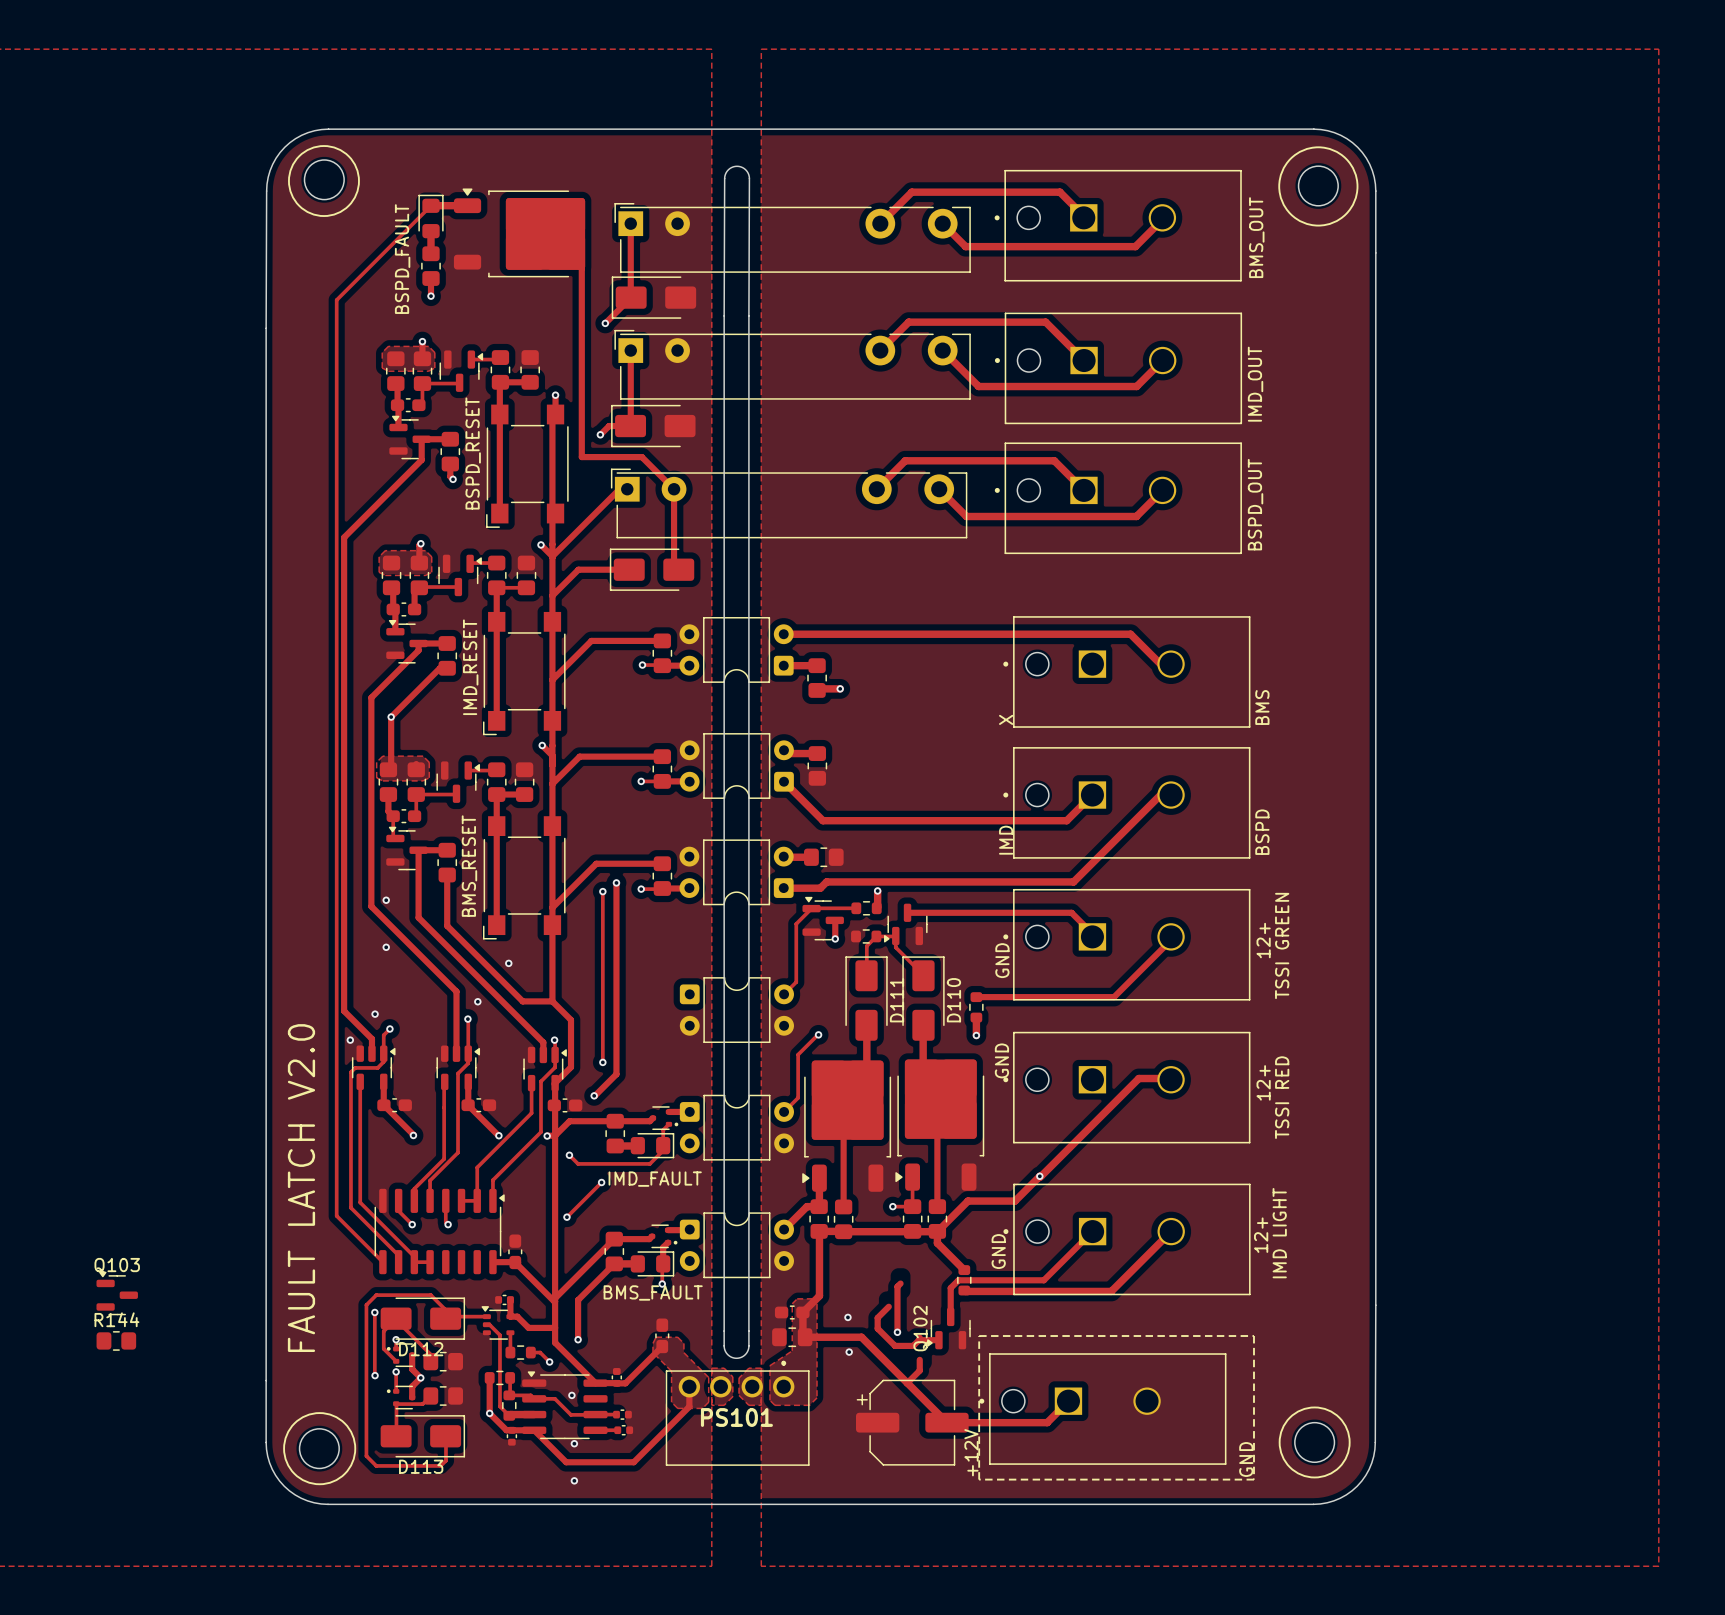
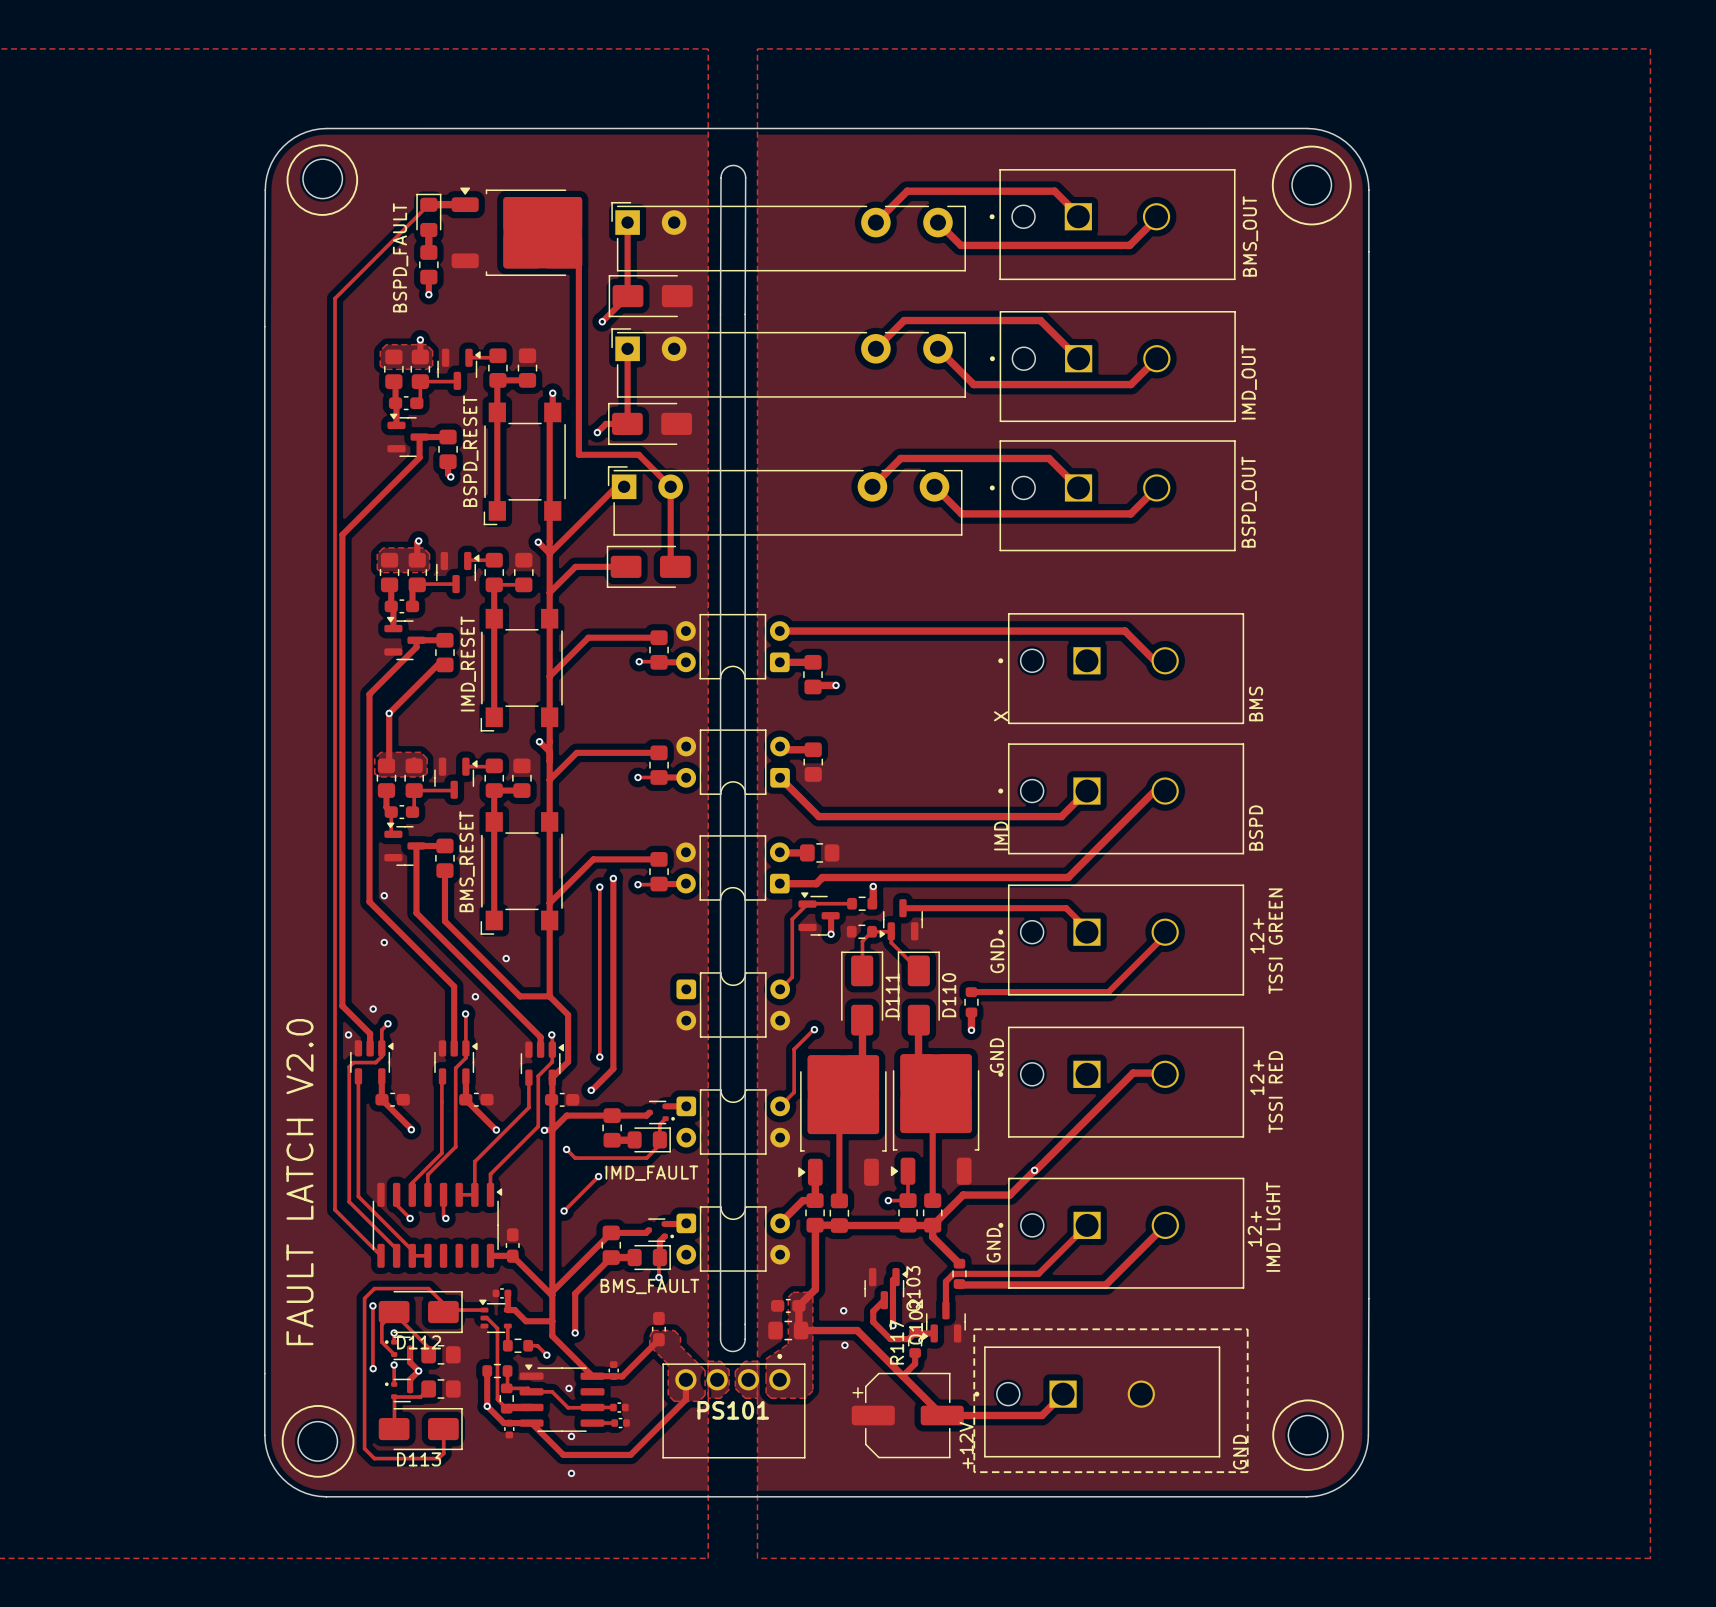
Q103 rotation: 0° (117, 1293) -> 90° clockwise (886, 1288)
Q103 position: (117, 1293) -> (886, 1288)
R144: (116, 1340) -> none
R117: none -> (915, 1342)

